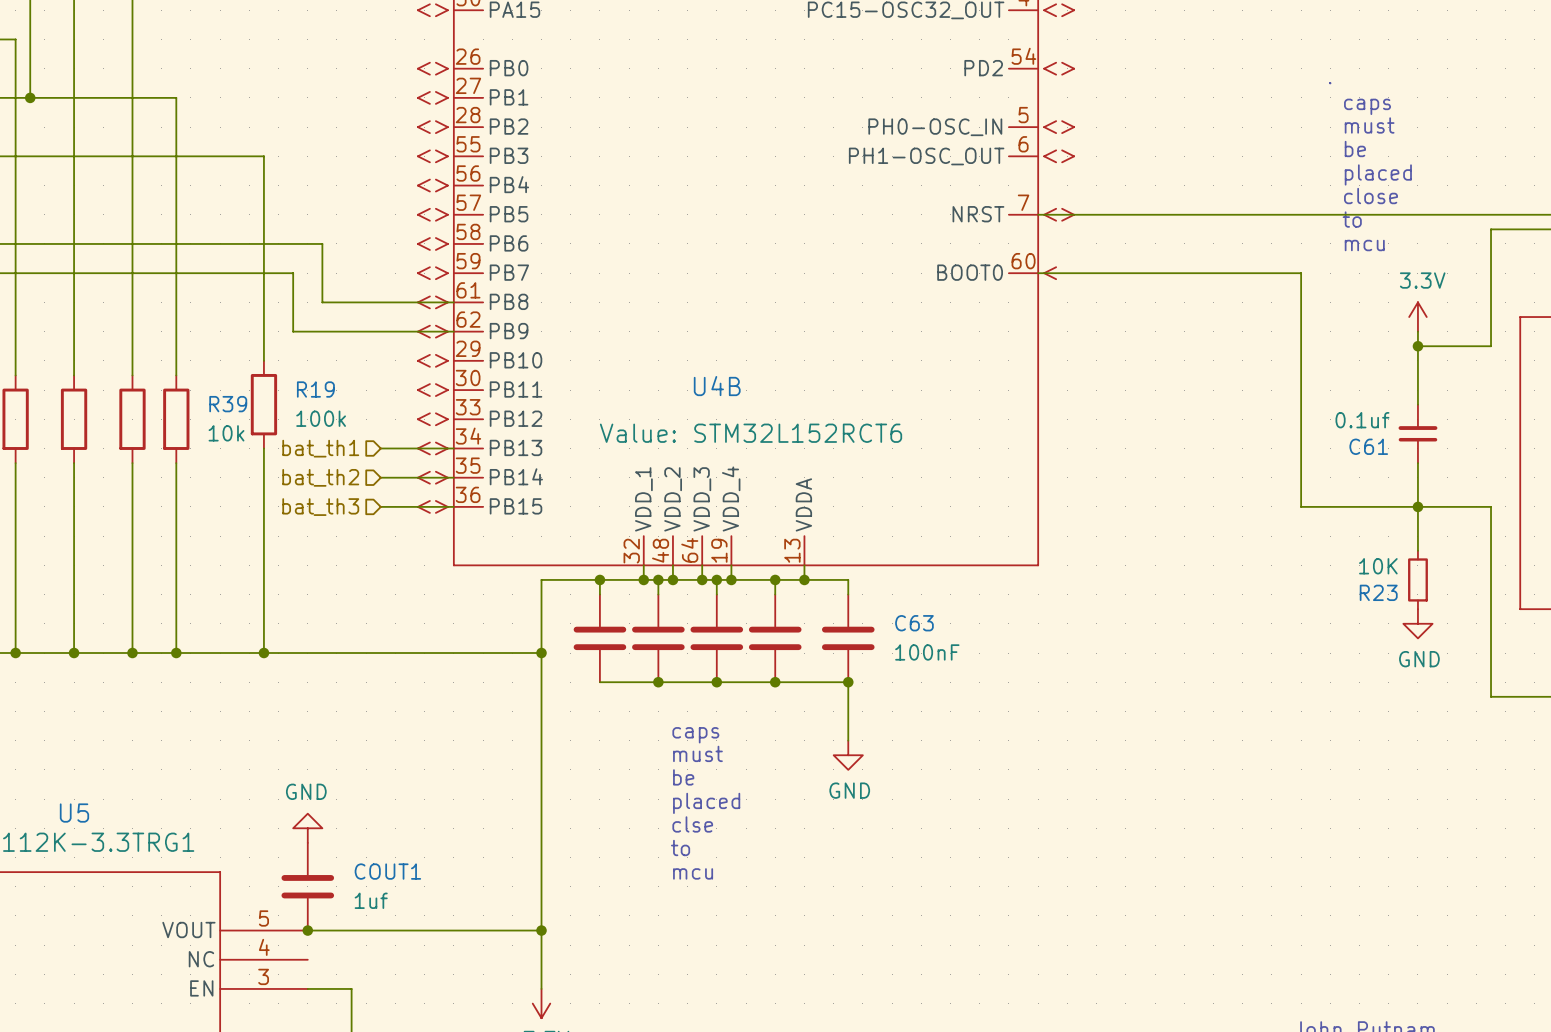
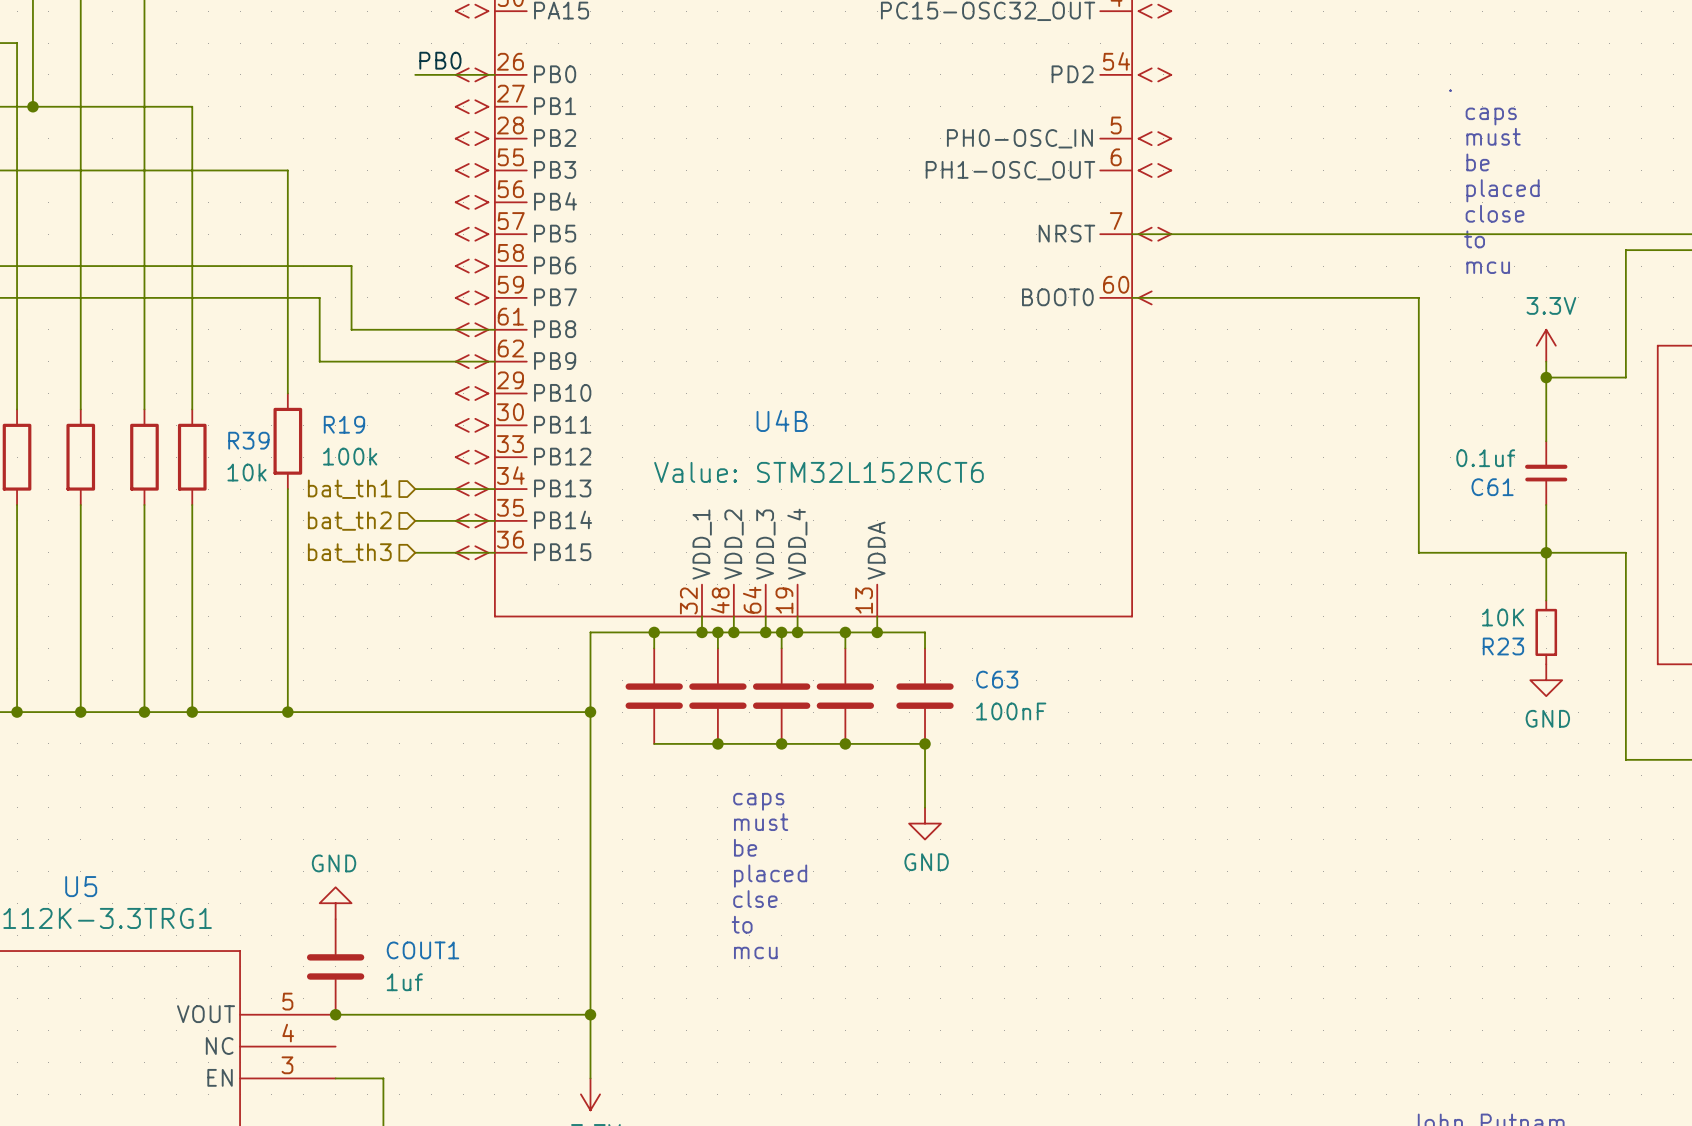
label: none -> PB0 (440, 60)
wire: none -> (415, 74) (494, 74)

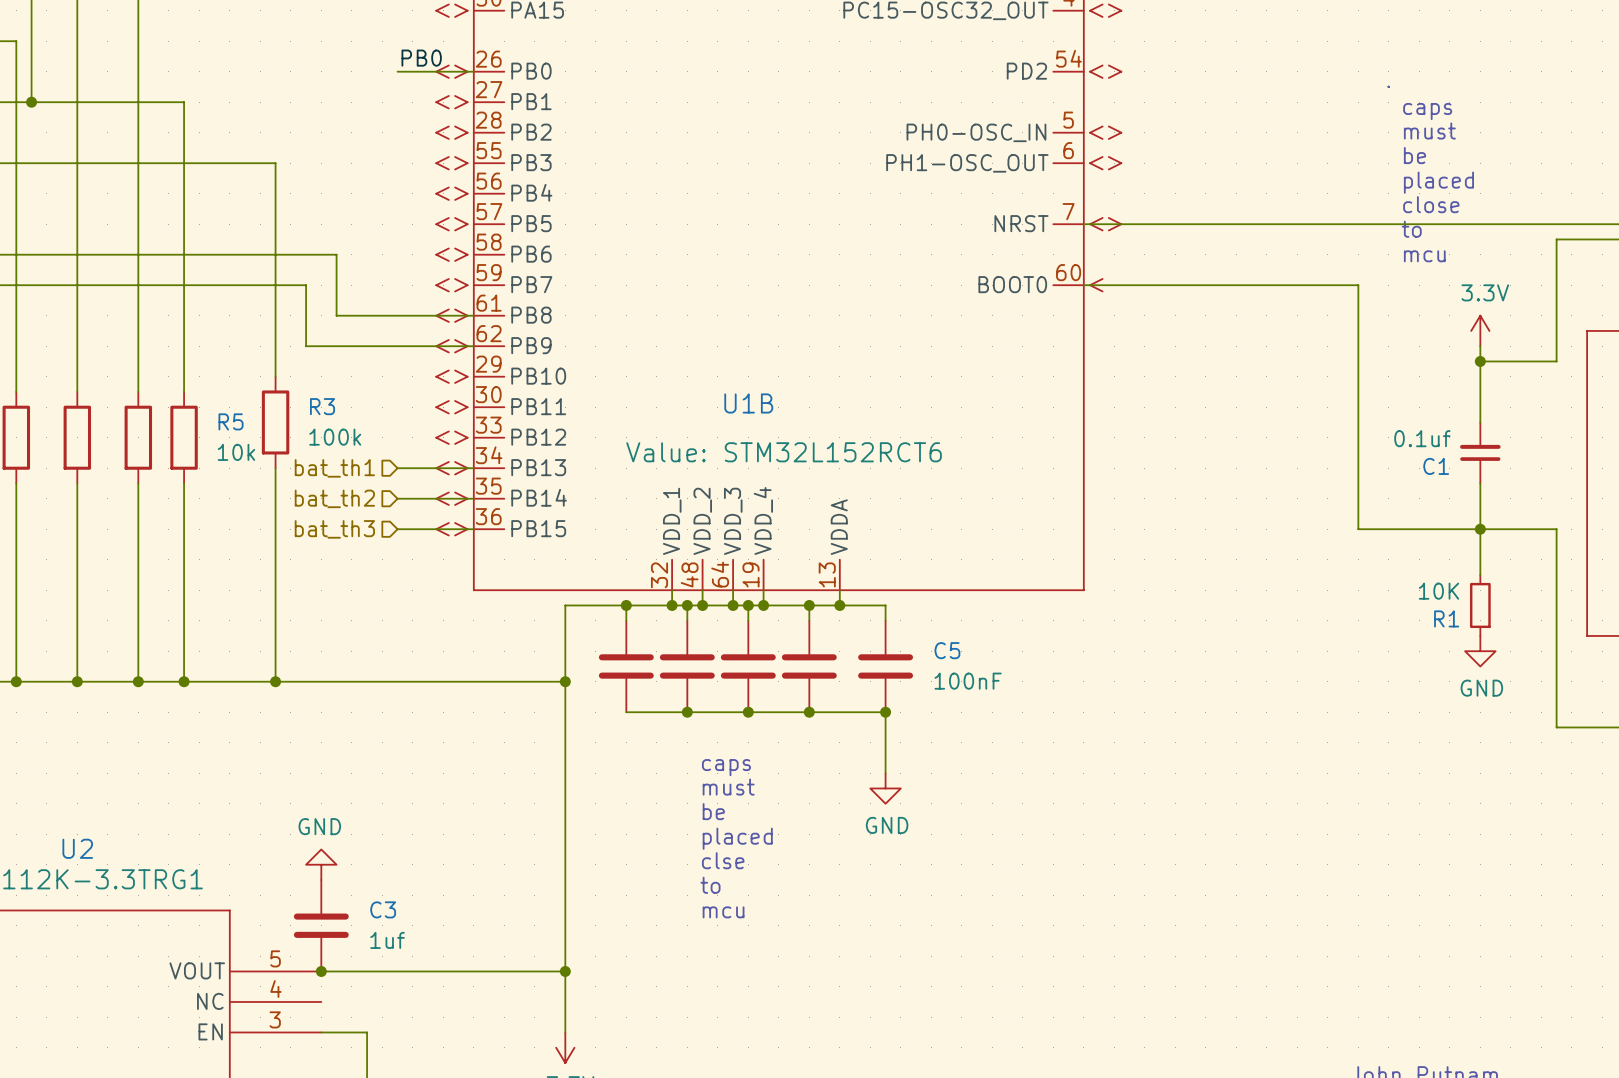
U4B name: U4B (782, 420) -> U1B (748, 403)
R19 name: R19 (344, 424) -> R3 (322, 406)
R39 name: R39 (248, 440) -> R5 (231, 421)
C61 name: C61 (1492, 487) -> C1 (1436, 466)
R23 name: R23 (1503, 646) -> R1 (1446, 618)
C63 name: C63 (997, 679) -> C5 (947, 650)
U5 name: U5 (81, 886) -> U2 (77, 848)
COUT1 name: COUT1 (422, 950) -> C3 (383, 909)

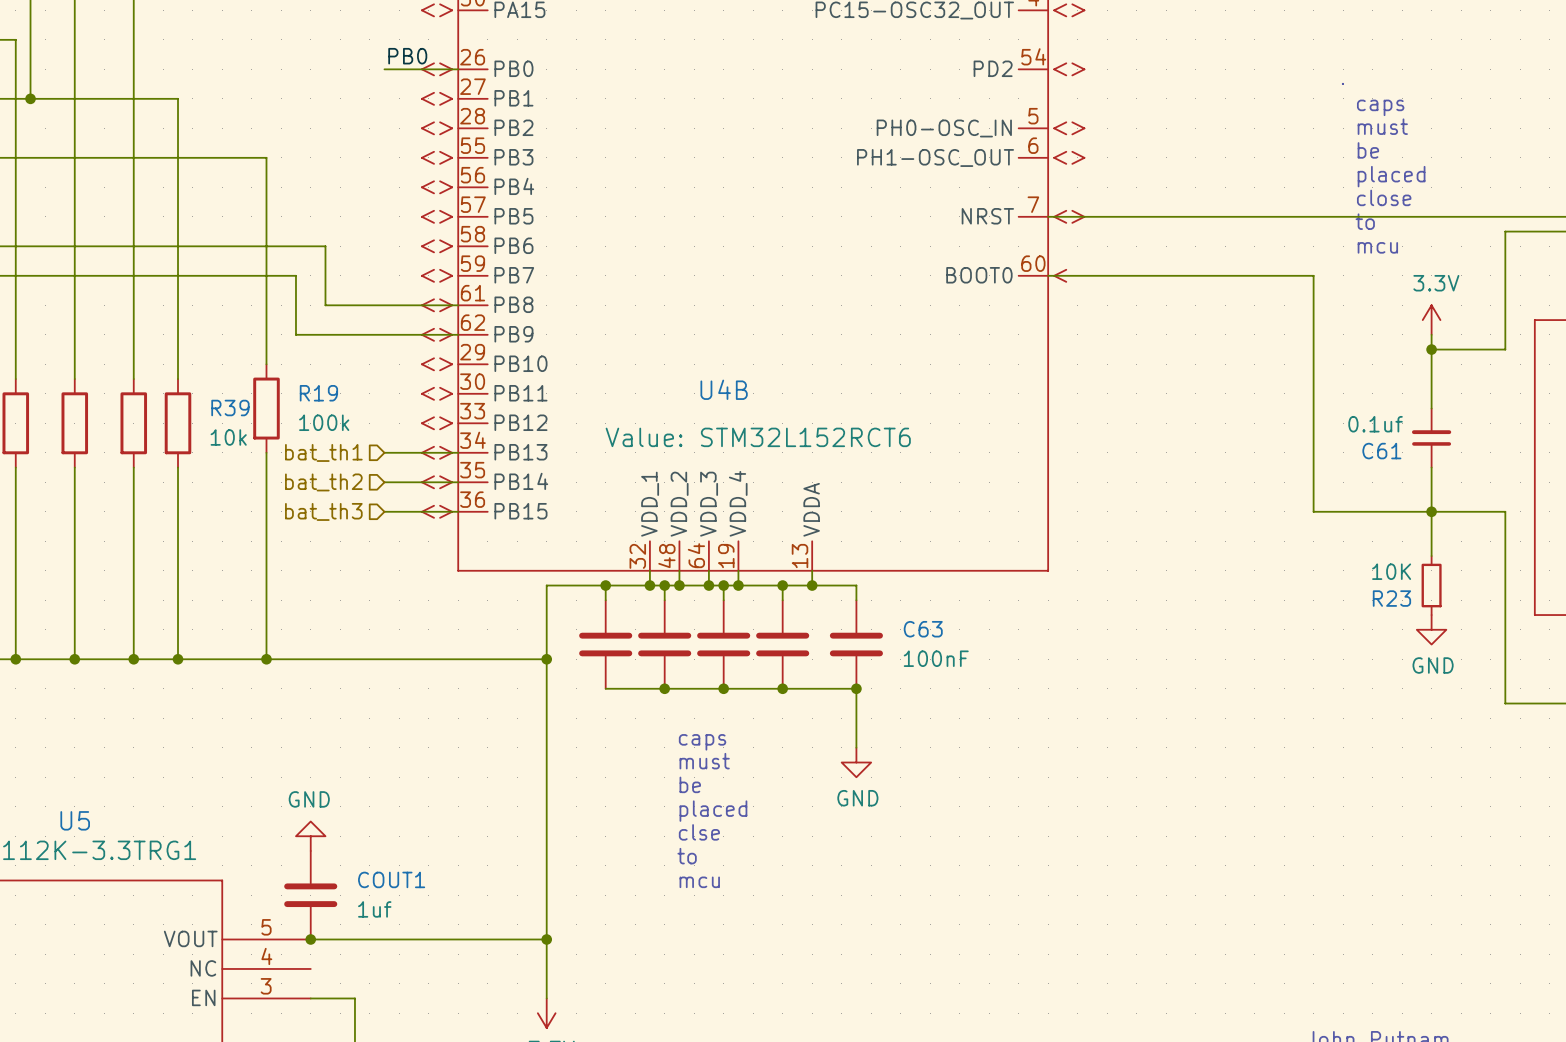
U1B name: U1B (748, 403) -> U4B (724, 389)
R3 name: R3 (322, 406) -> R19 (318, 393)
R5 name: R5 (231, 421) -> R39 (230, 408)
C1 name: C1 (1436, 466) -> C61 (1381, 451)
R1 name: R1 (1446, 618) -> R23 (1391, 598)
C5 name: C5 (947, 650) -> C63 (923, 629)
U2 name: U2 (77, 848) -> U5 (75, 820)
C3 name: C3 (383, 909) -> COUT1 (391, 879)

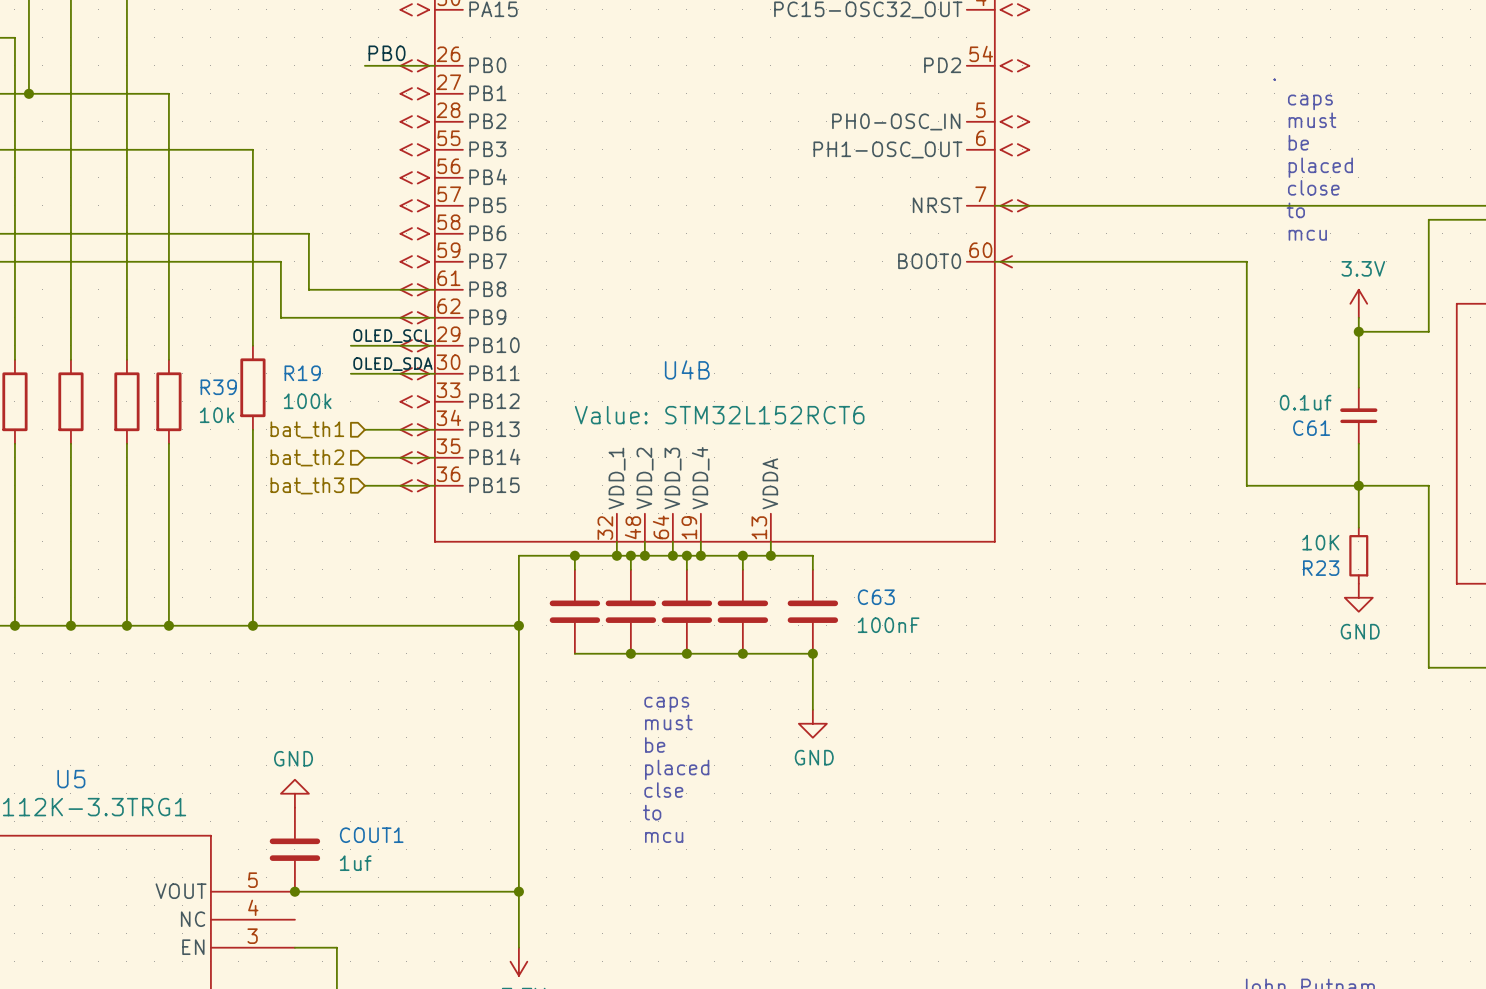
label: none -> OLED_SCL (392, 336)
wire: none -> (350, 345) (434, 345)
label: none -> OLED_SDA (392, 364)
wire: none -> (350, 373) (434, 373)

